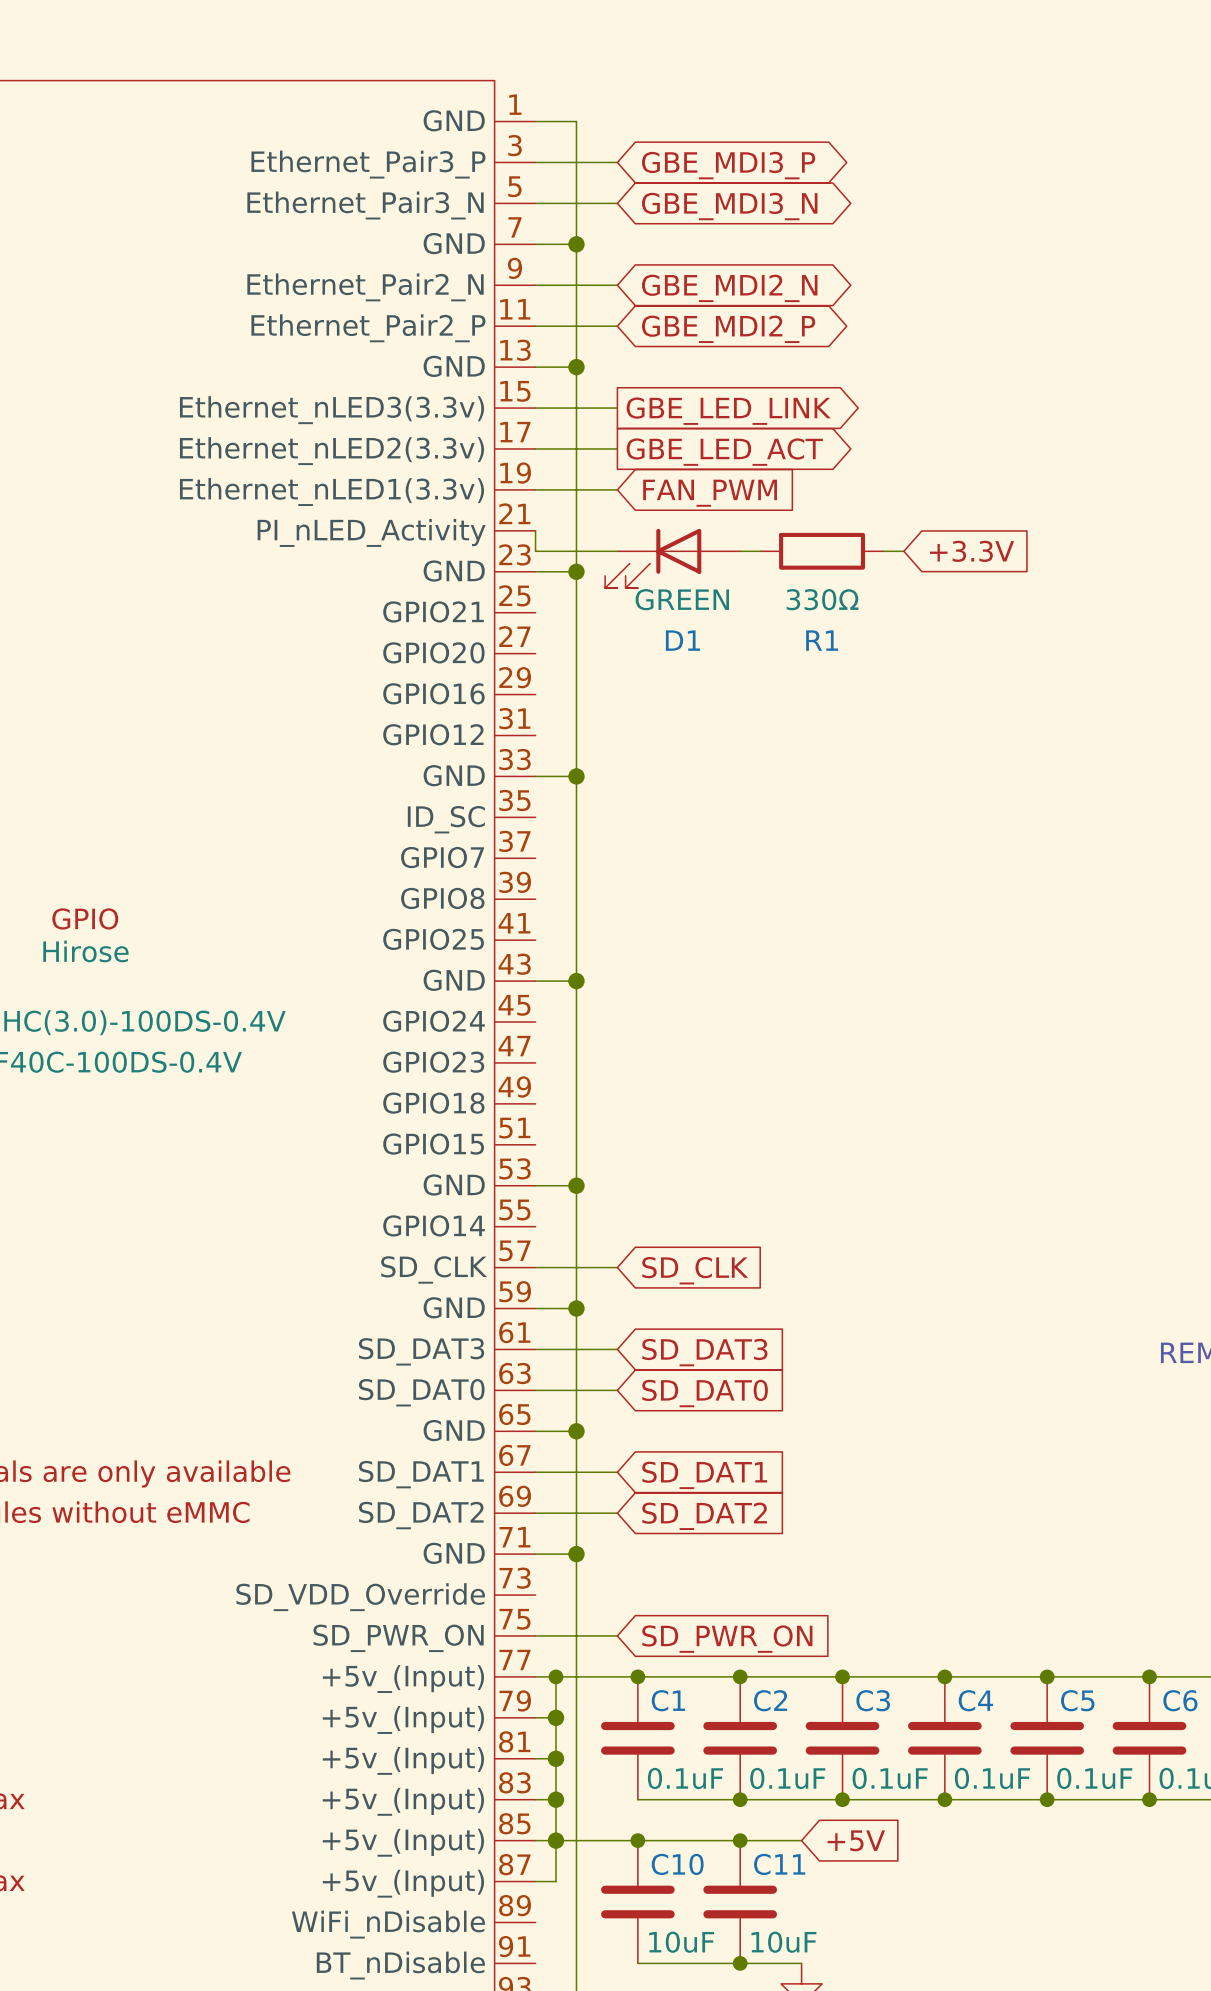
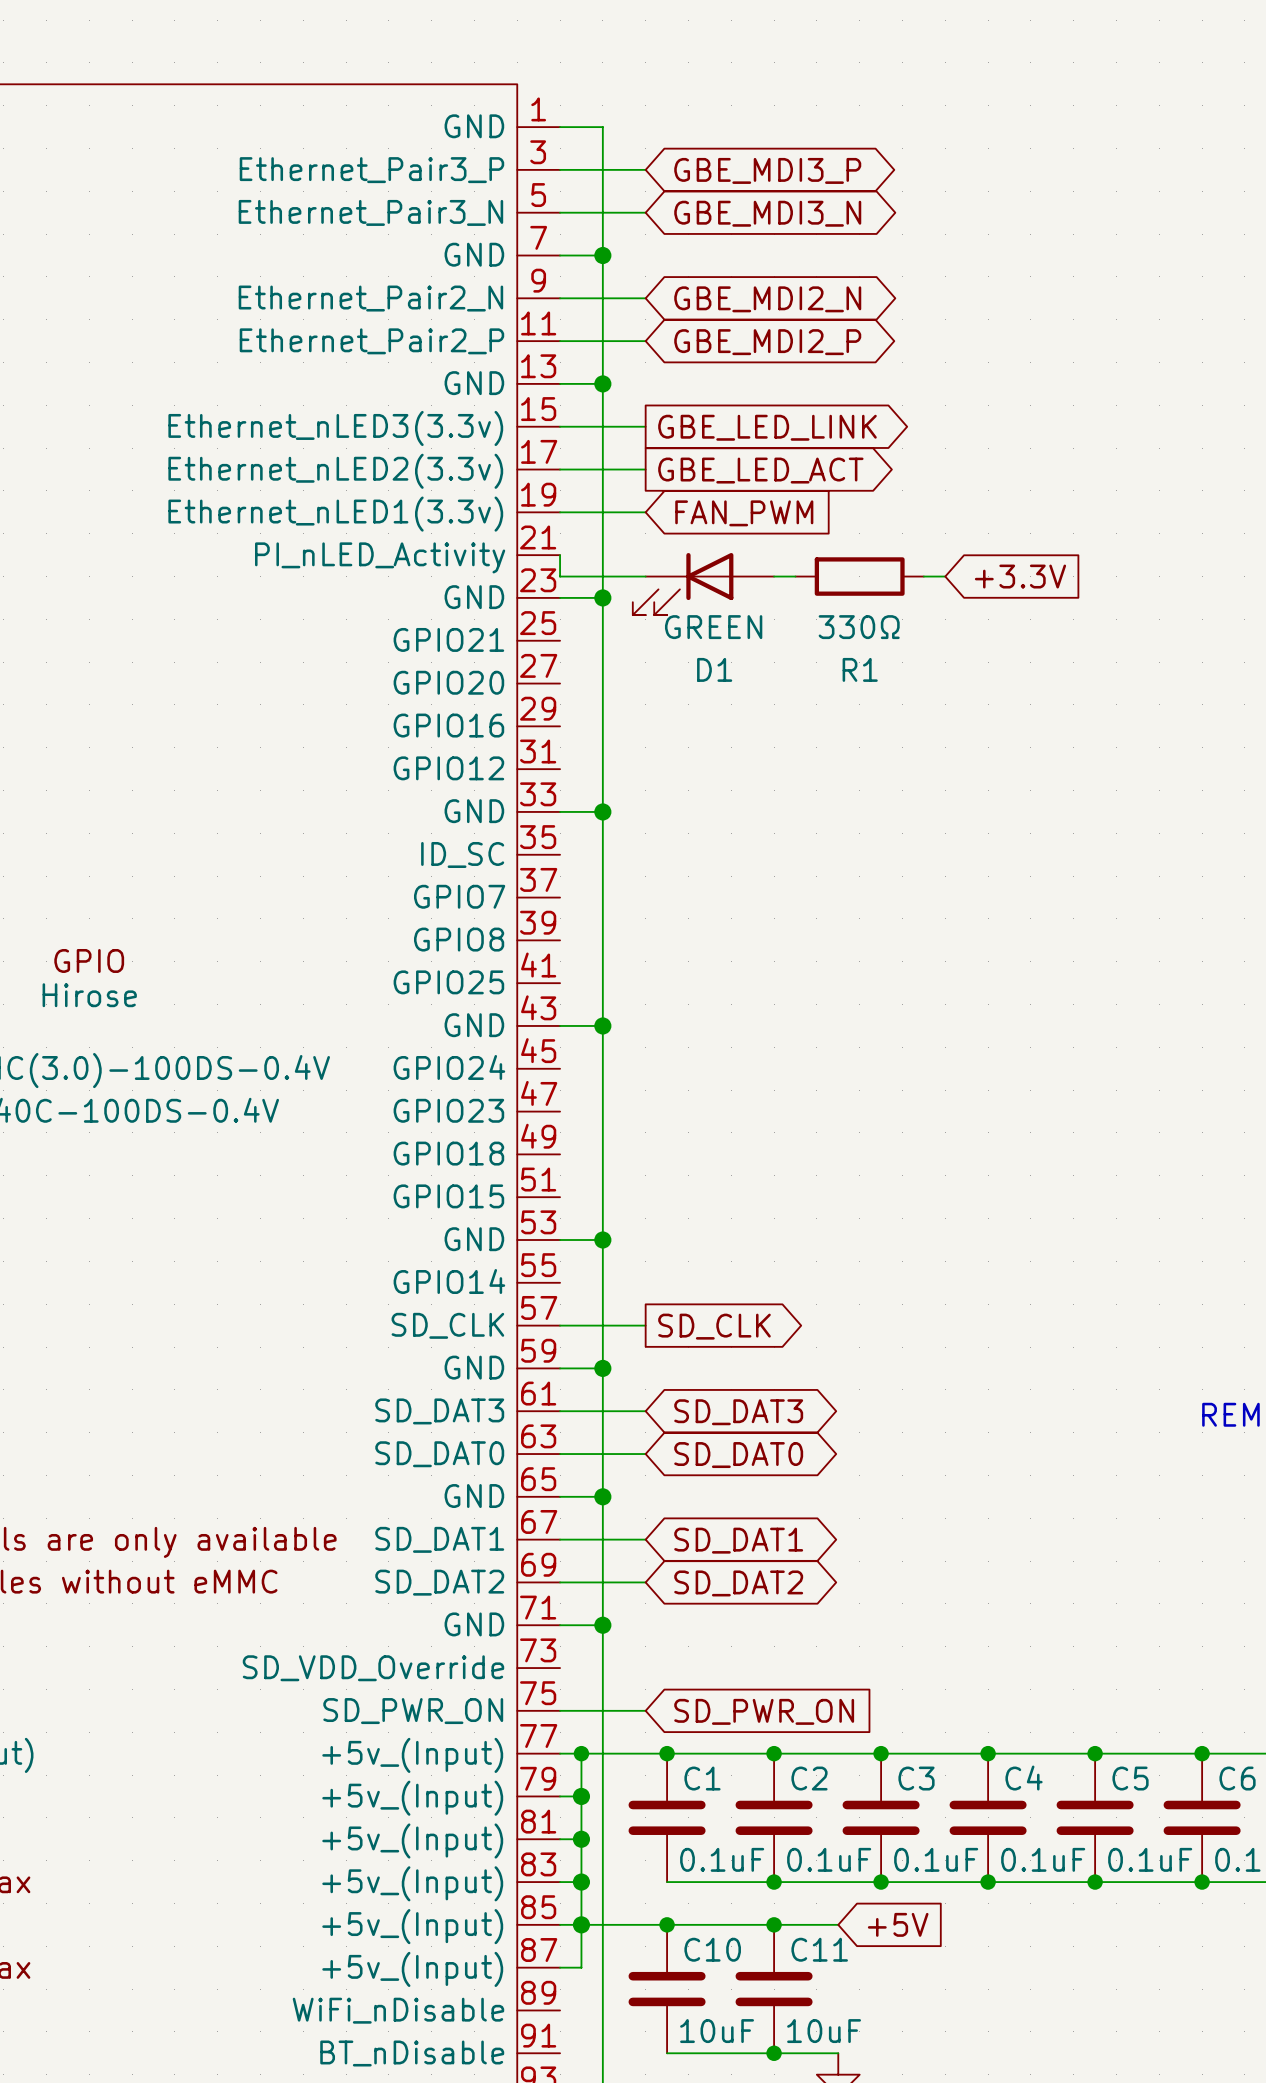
global label shape: input (695, 1270) -> output (714, 1326)
global label shape: input (704, 1352) -> bidirectional (738, 1412)
global label shape: input (705, 1393) -> bidirectional (738, 1455)
global label shape: input (704, 1475) -> bidirectional (738, 1540)
global label shape: input (704, 1516) -> bidirectional (738, 1583)

